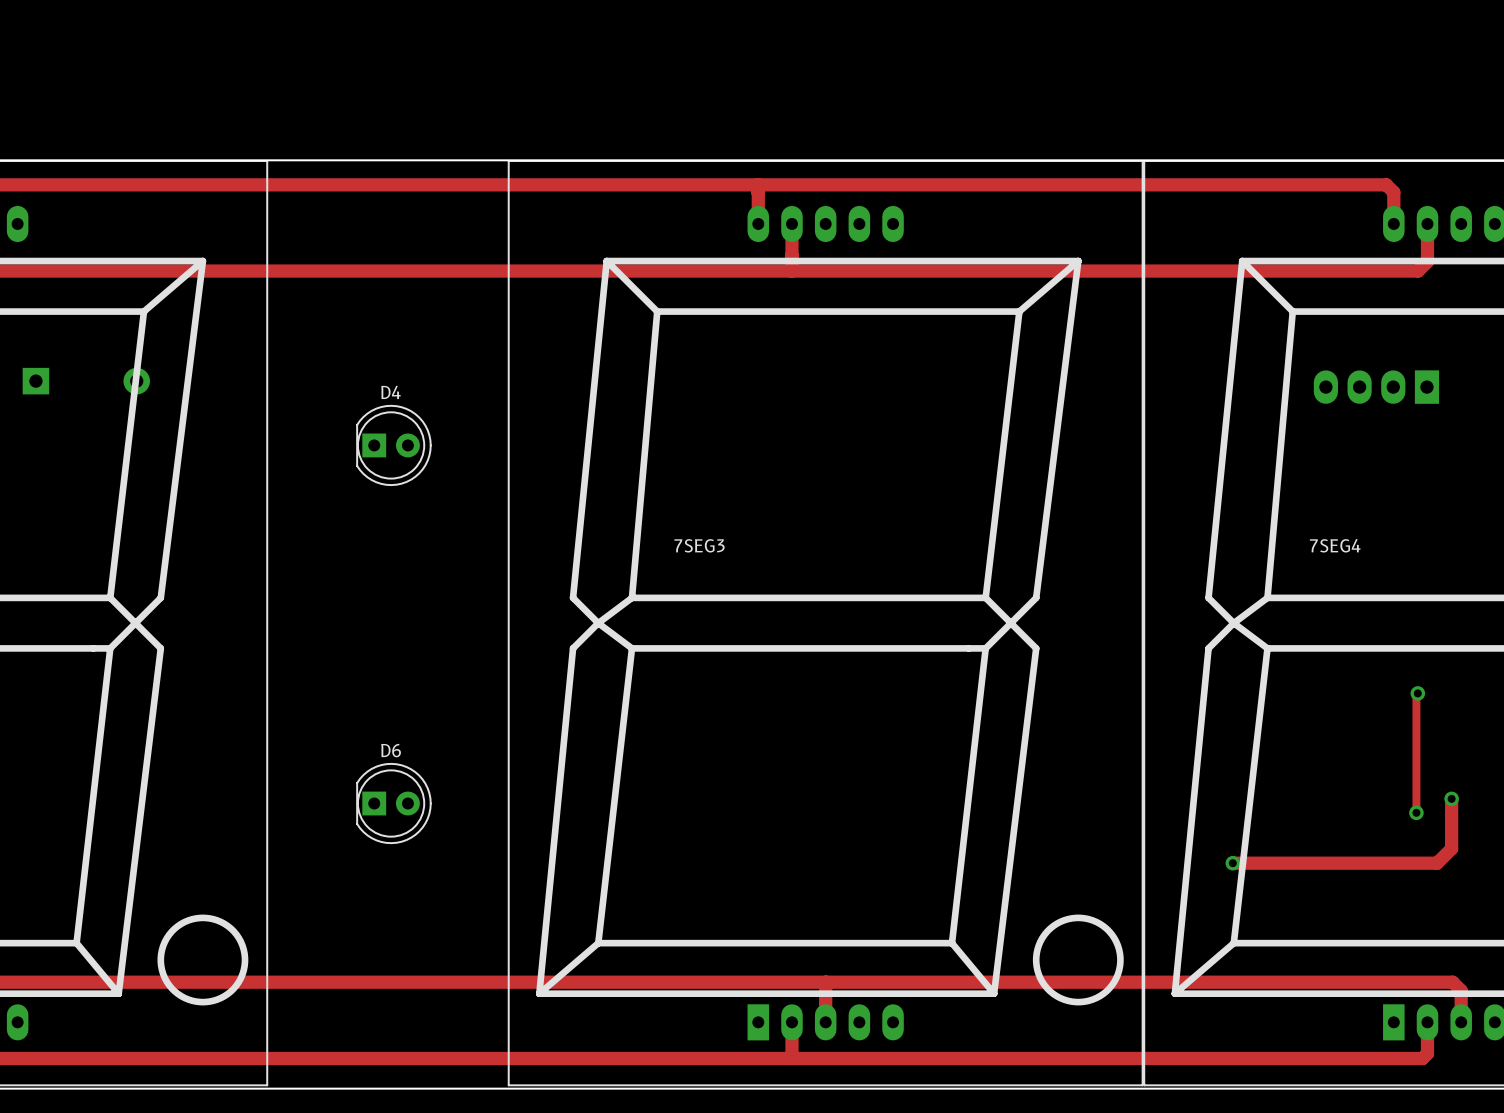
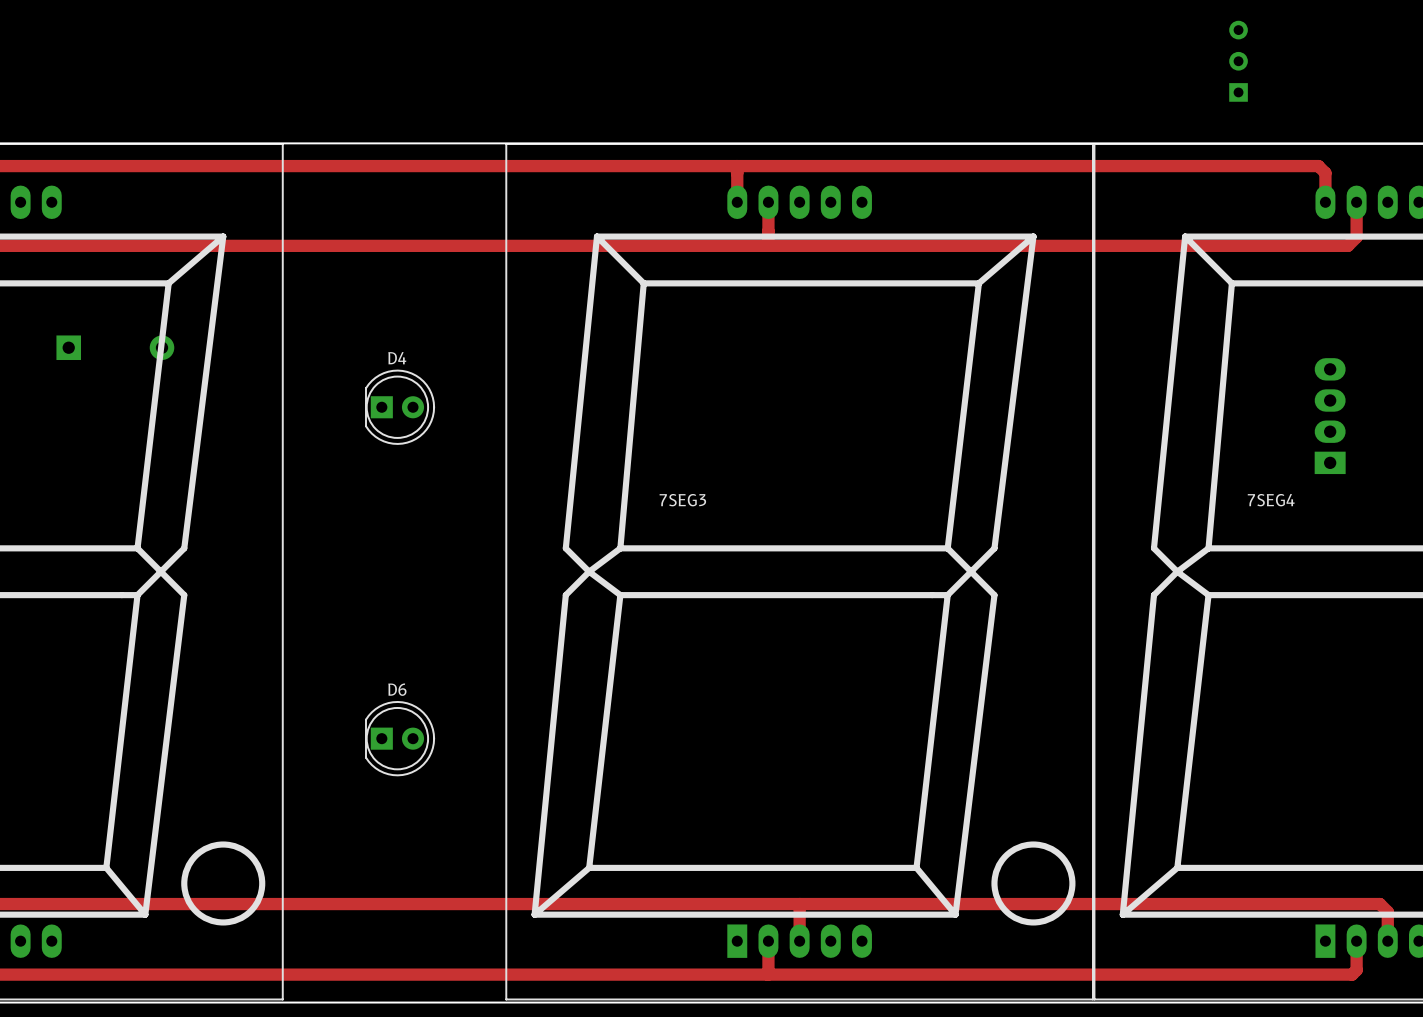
part: none -> (1238, 61)
part rotation: 0° (1376, 387) -> 90° clockwise (1330, 416)
track: (1417, 693) (1416, 812) -> none
via: (1417, 693) -> none
track: (1451, 798) (1451, 848) (1437, 863) (1232, 863) -> none
via: (1451, 798) -> none
via: (1416, 812) -> none
via: (1232, 863) -> none

